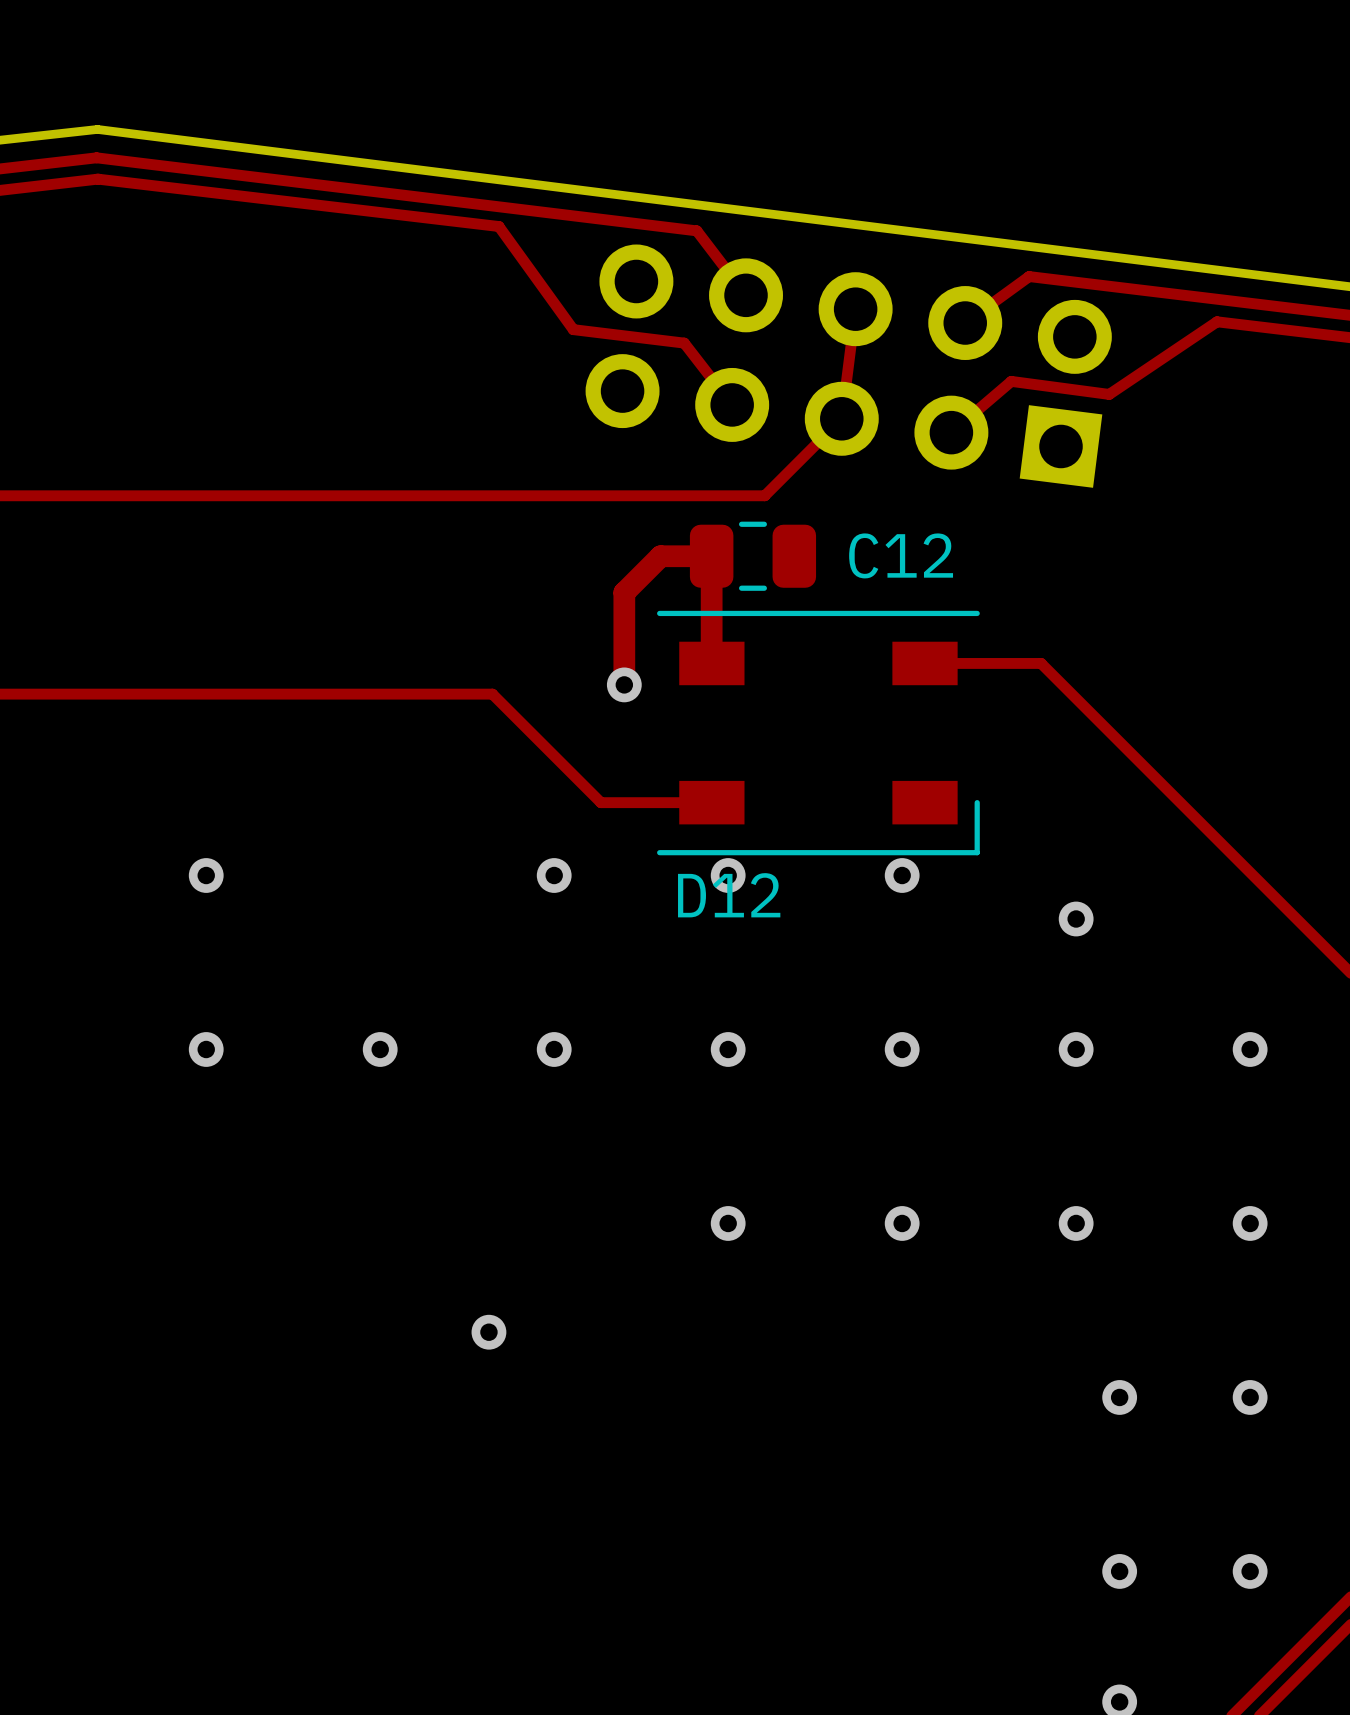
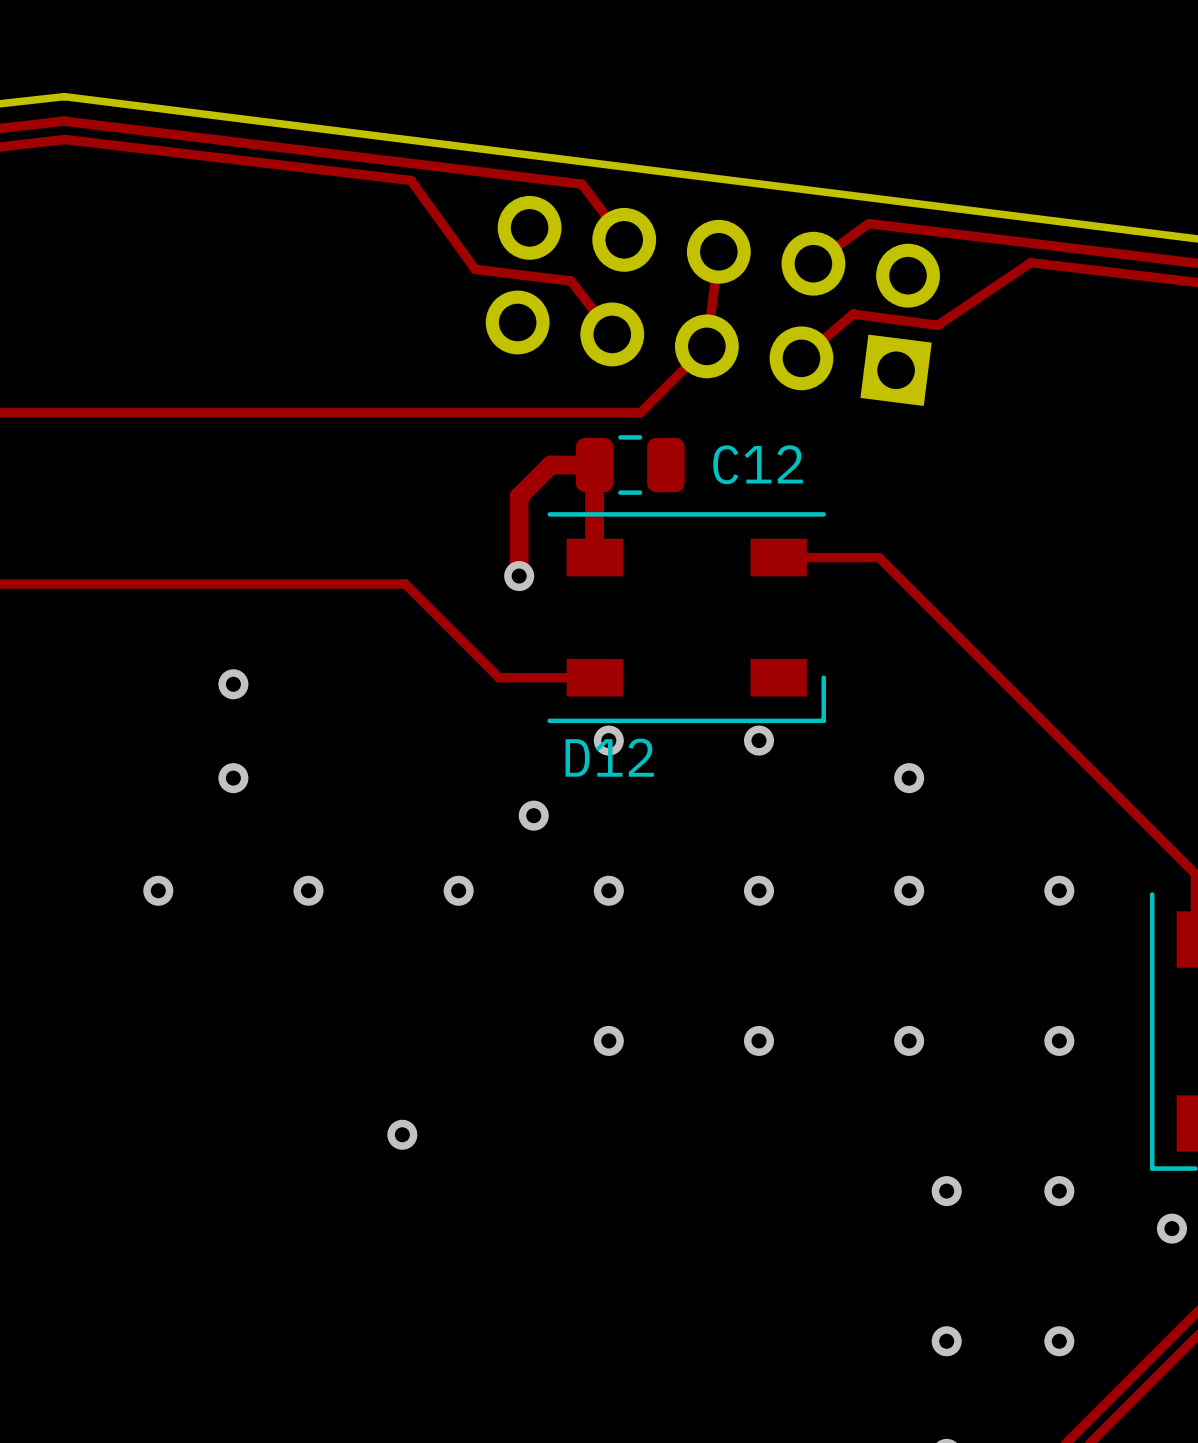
via: none -> (233, 684)
via: (206, 875) -> none
via position: (554, 875) -> (533, 815)
via: none -> (233, 778)

